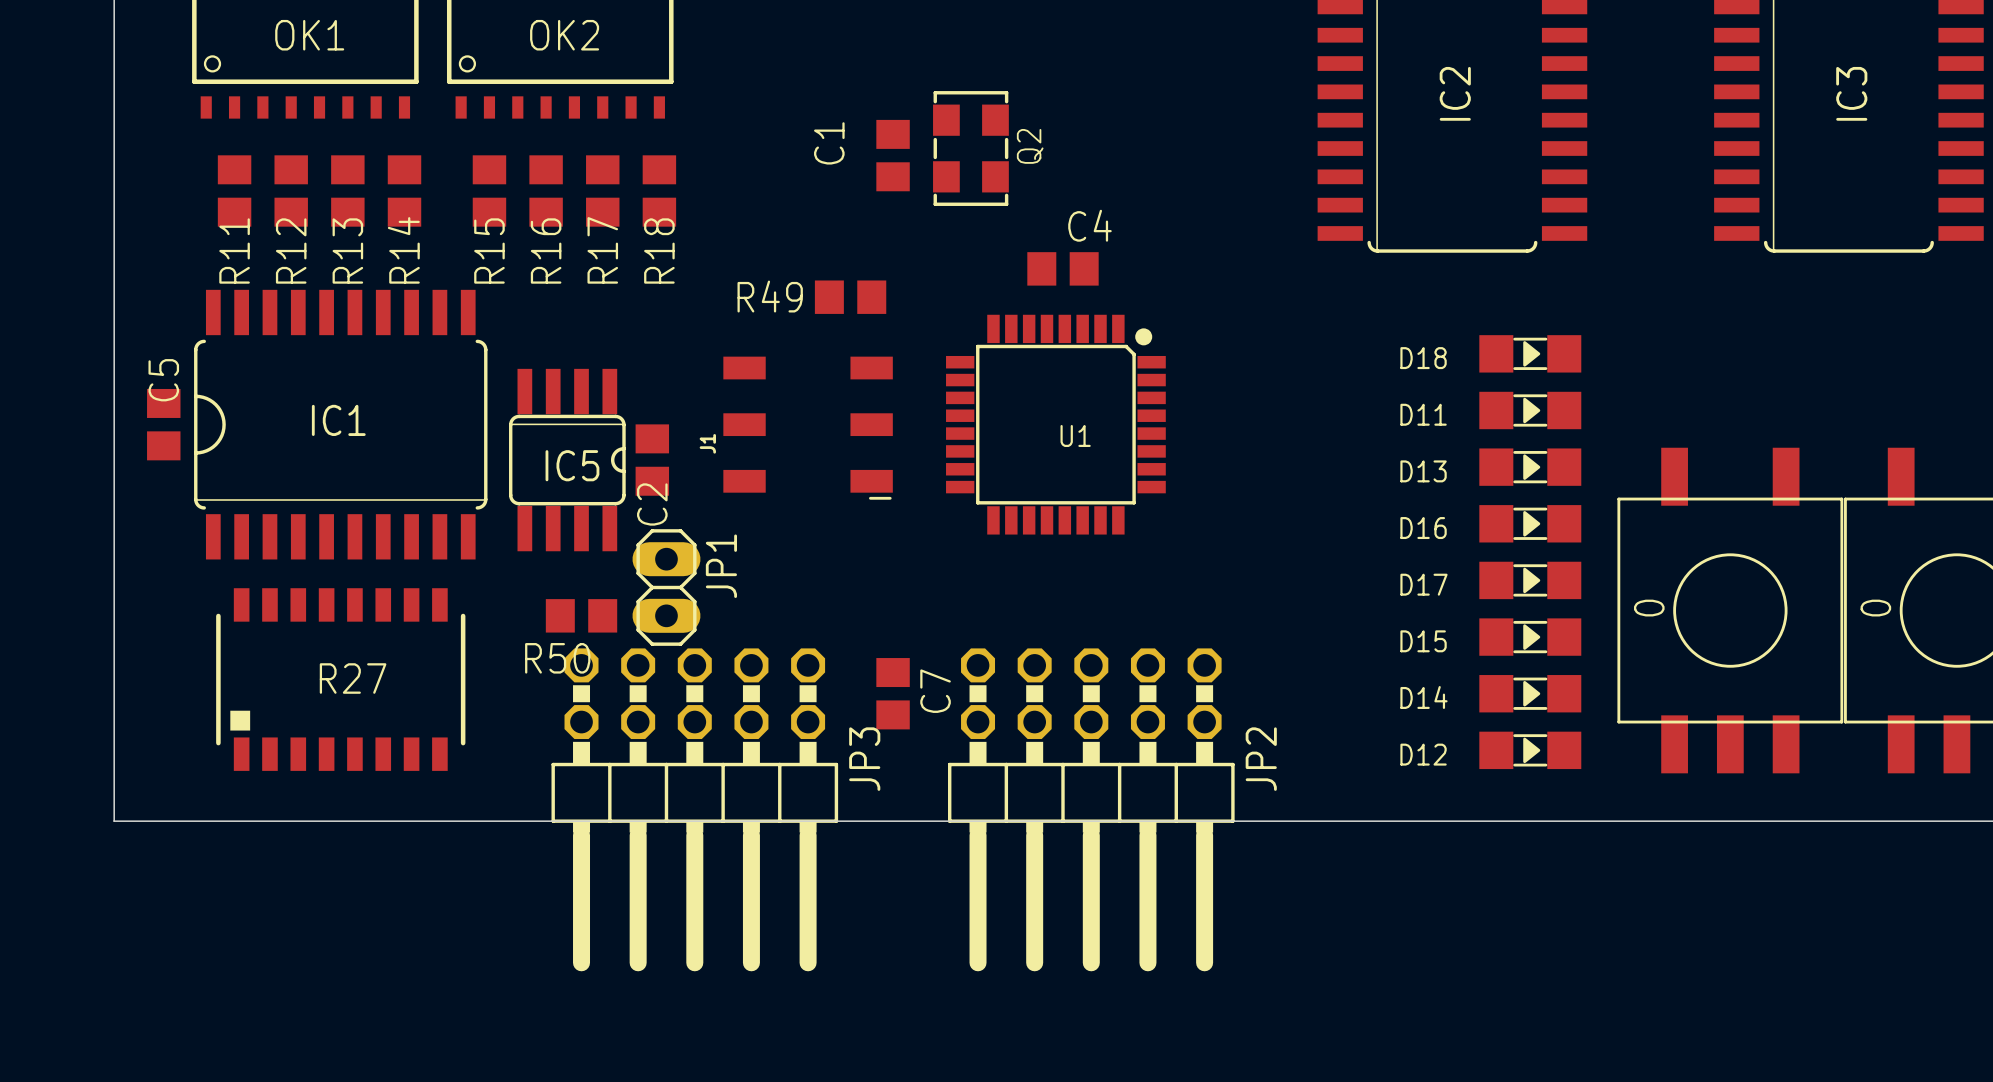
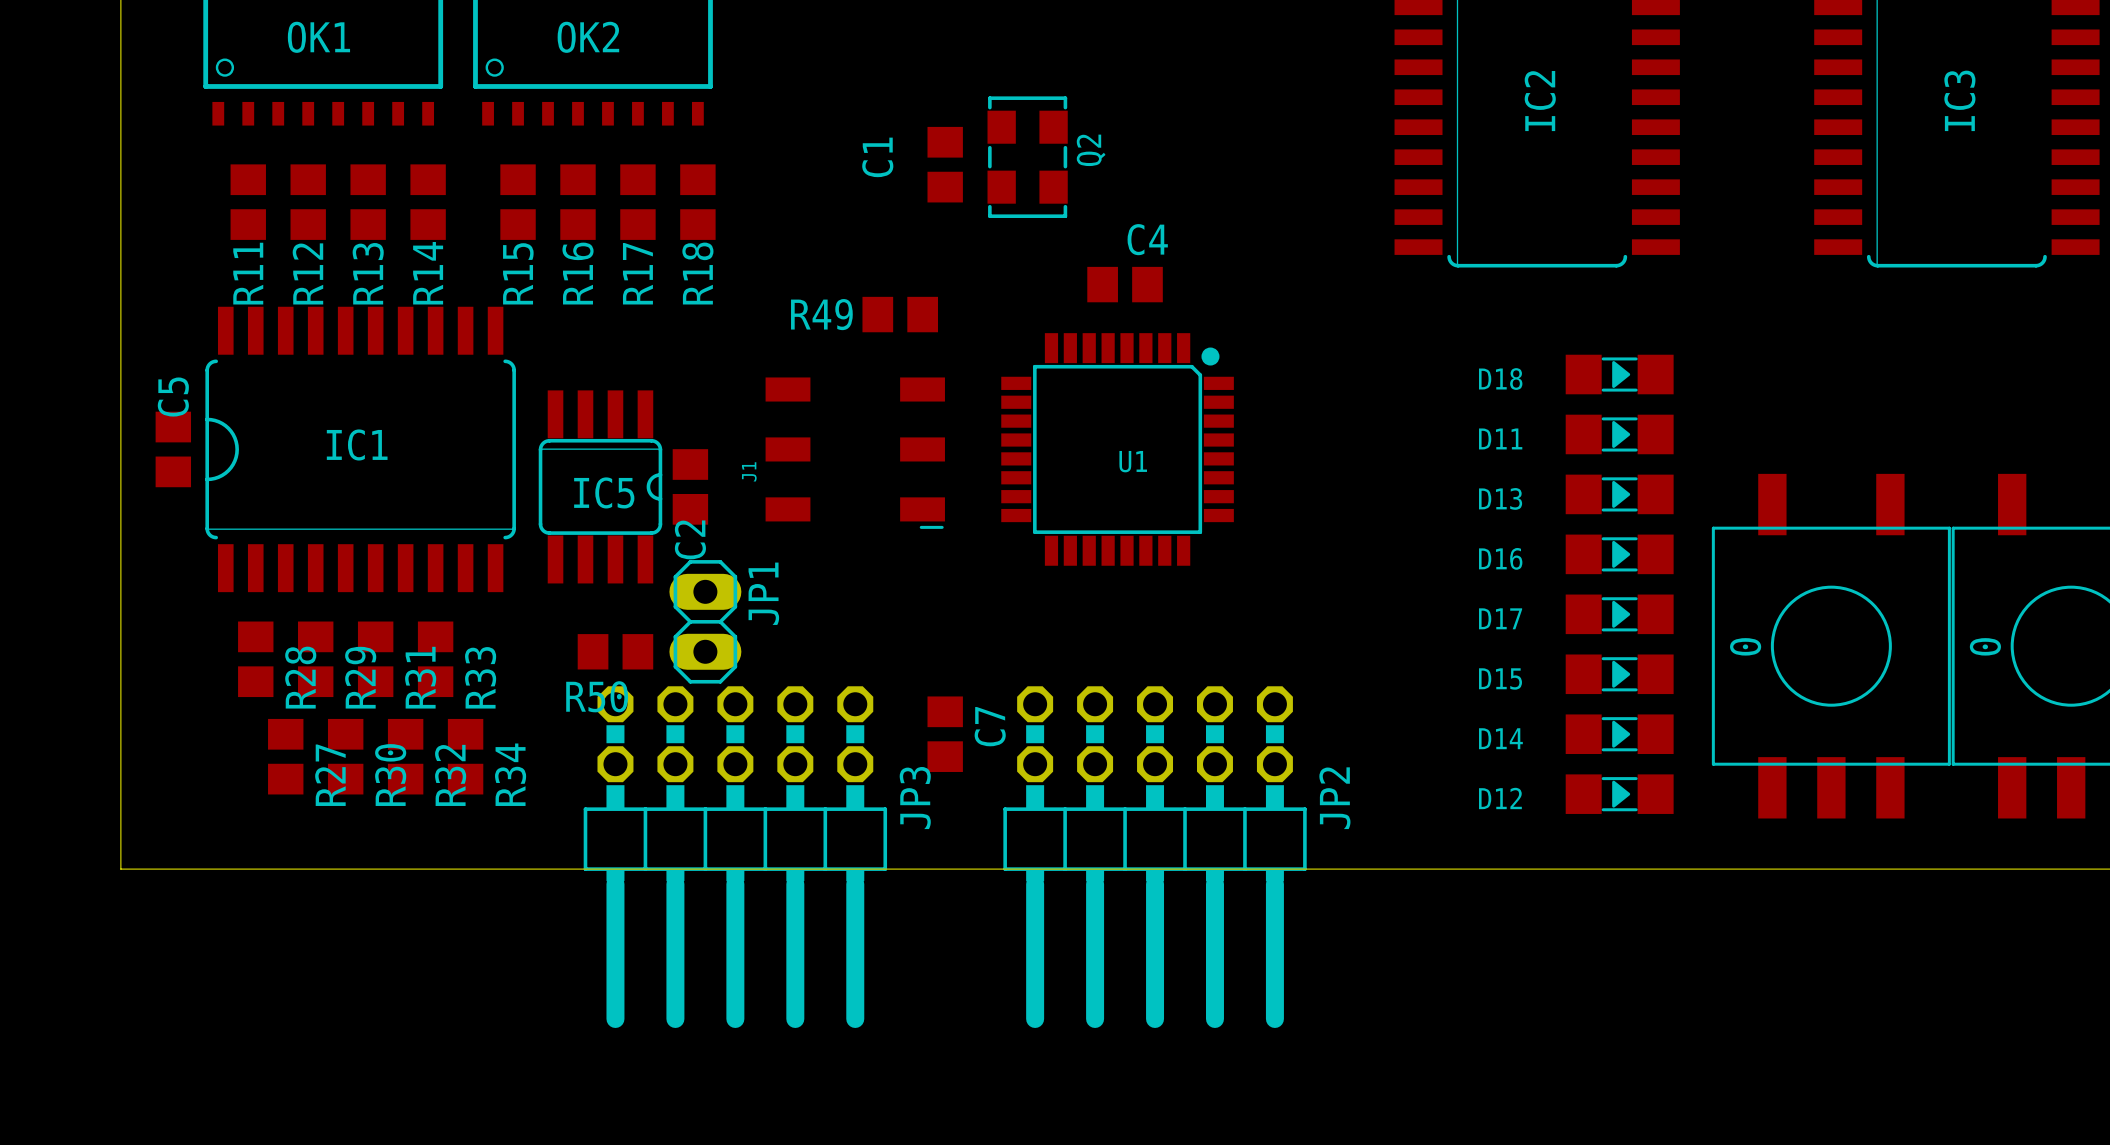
R27 footprint: [216, 588, 466, 771] -> [268, 718, 304, 795]
R28: none -> (255, 659)
R29: none -> (315, 659)
R31: none -> (375, 659)
R33: none -> (435, 659)
R30: none -> (345, 756)
R32: none -> (405, 756)
R34: none -> (465, 756)

